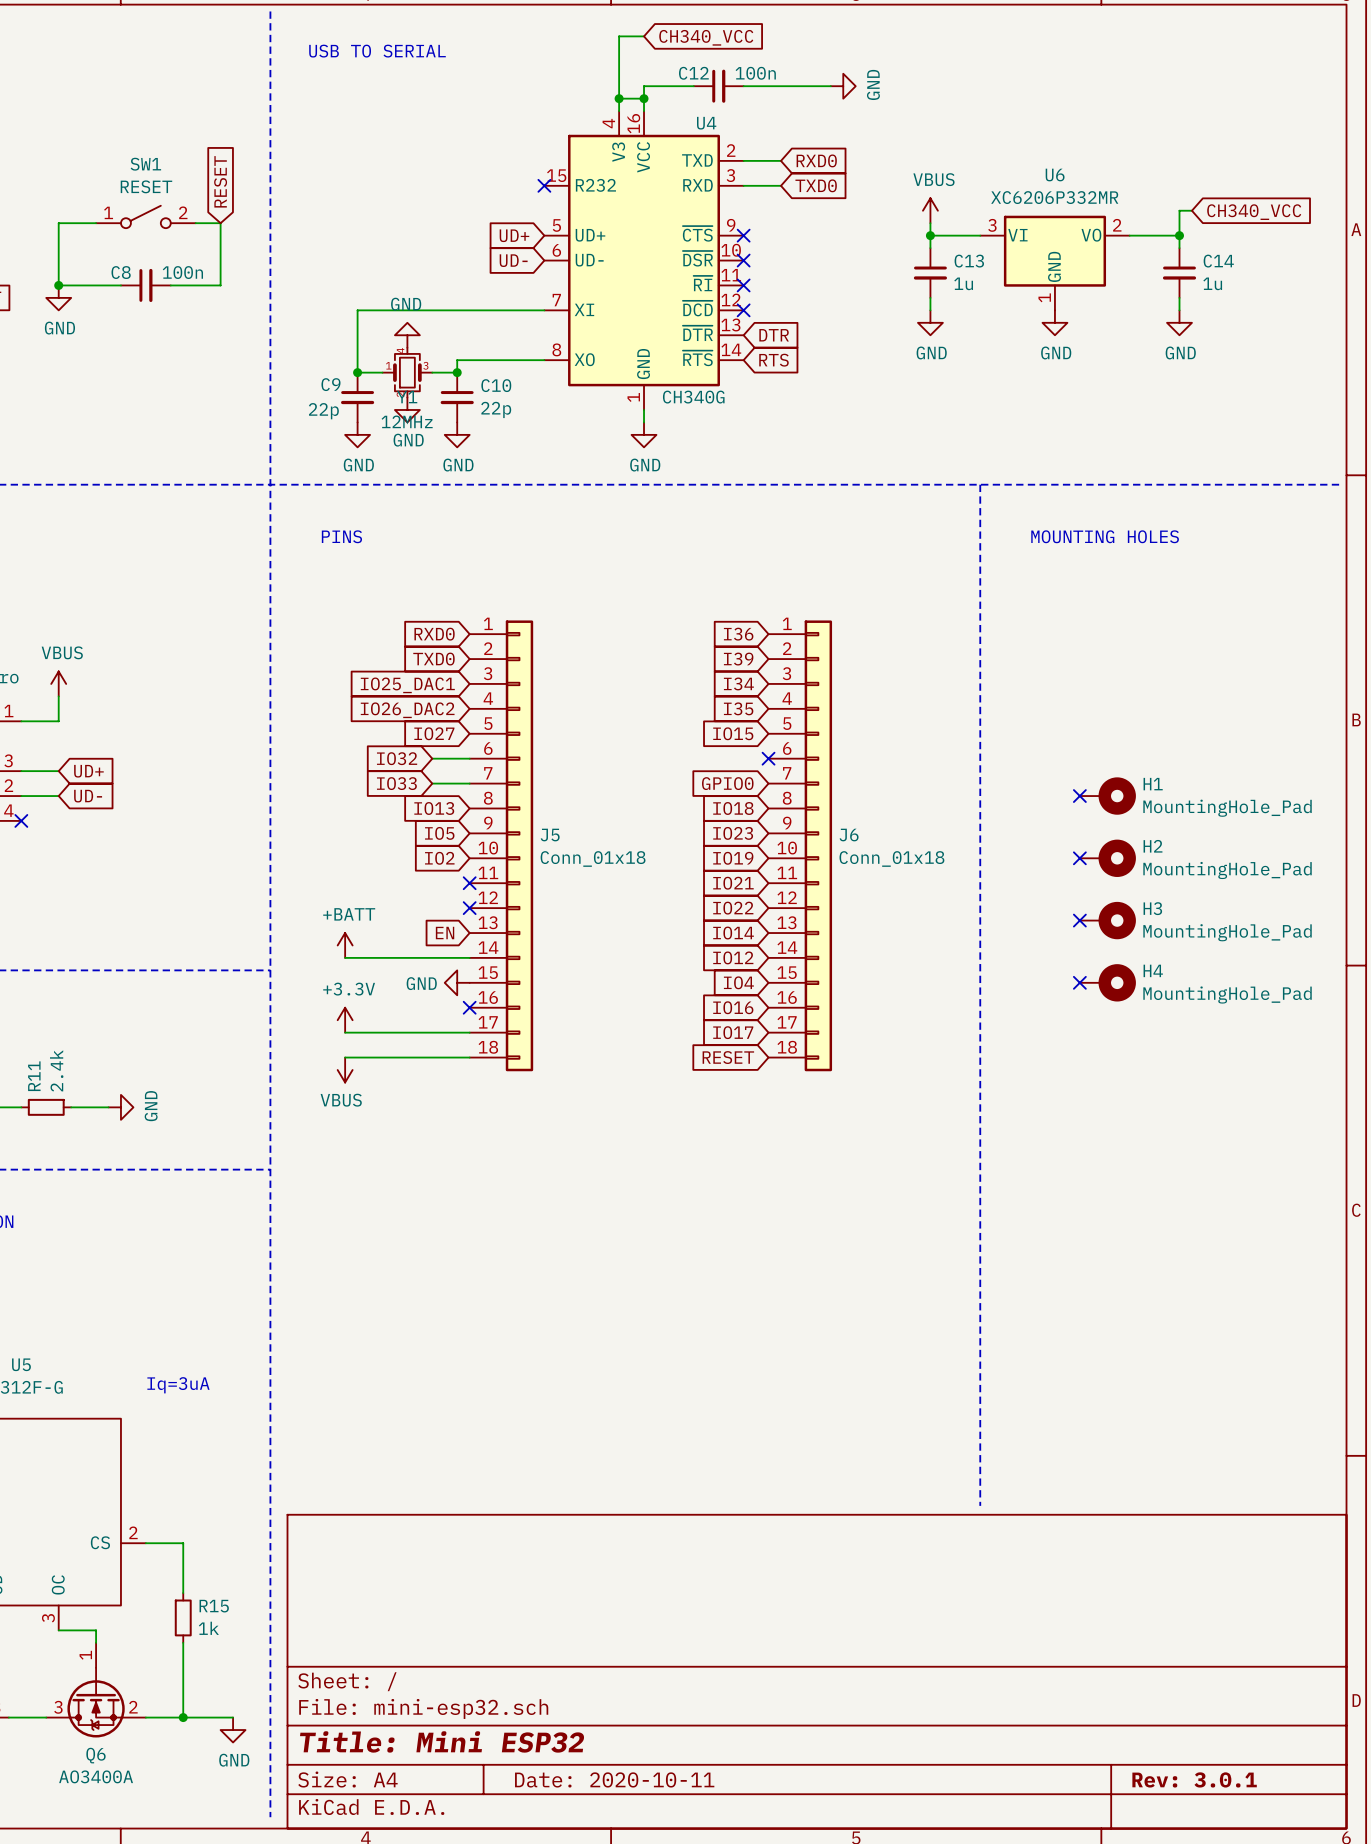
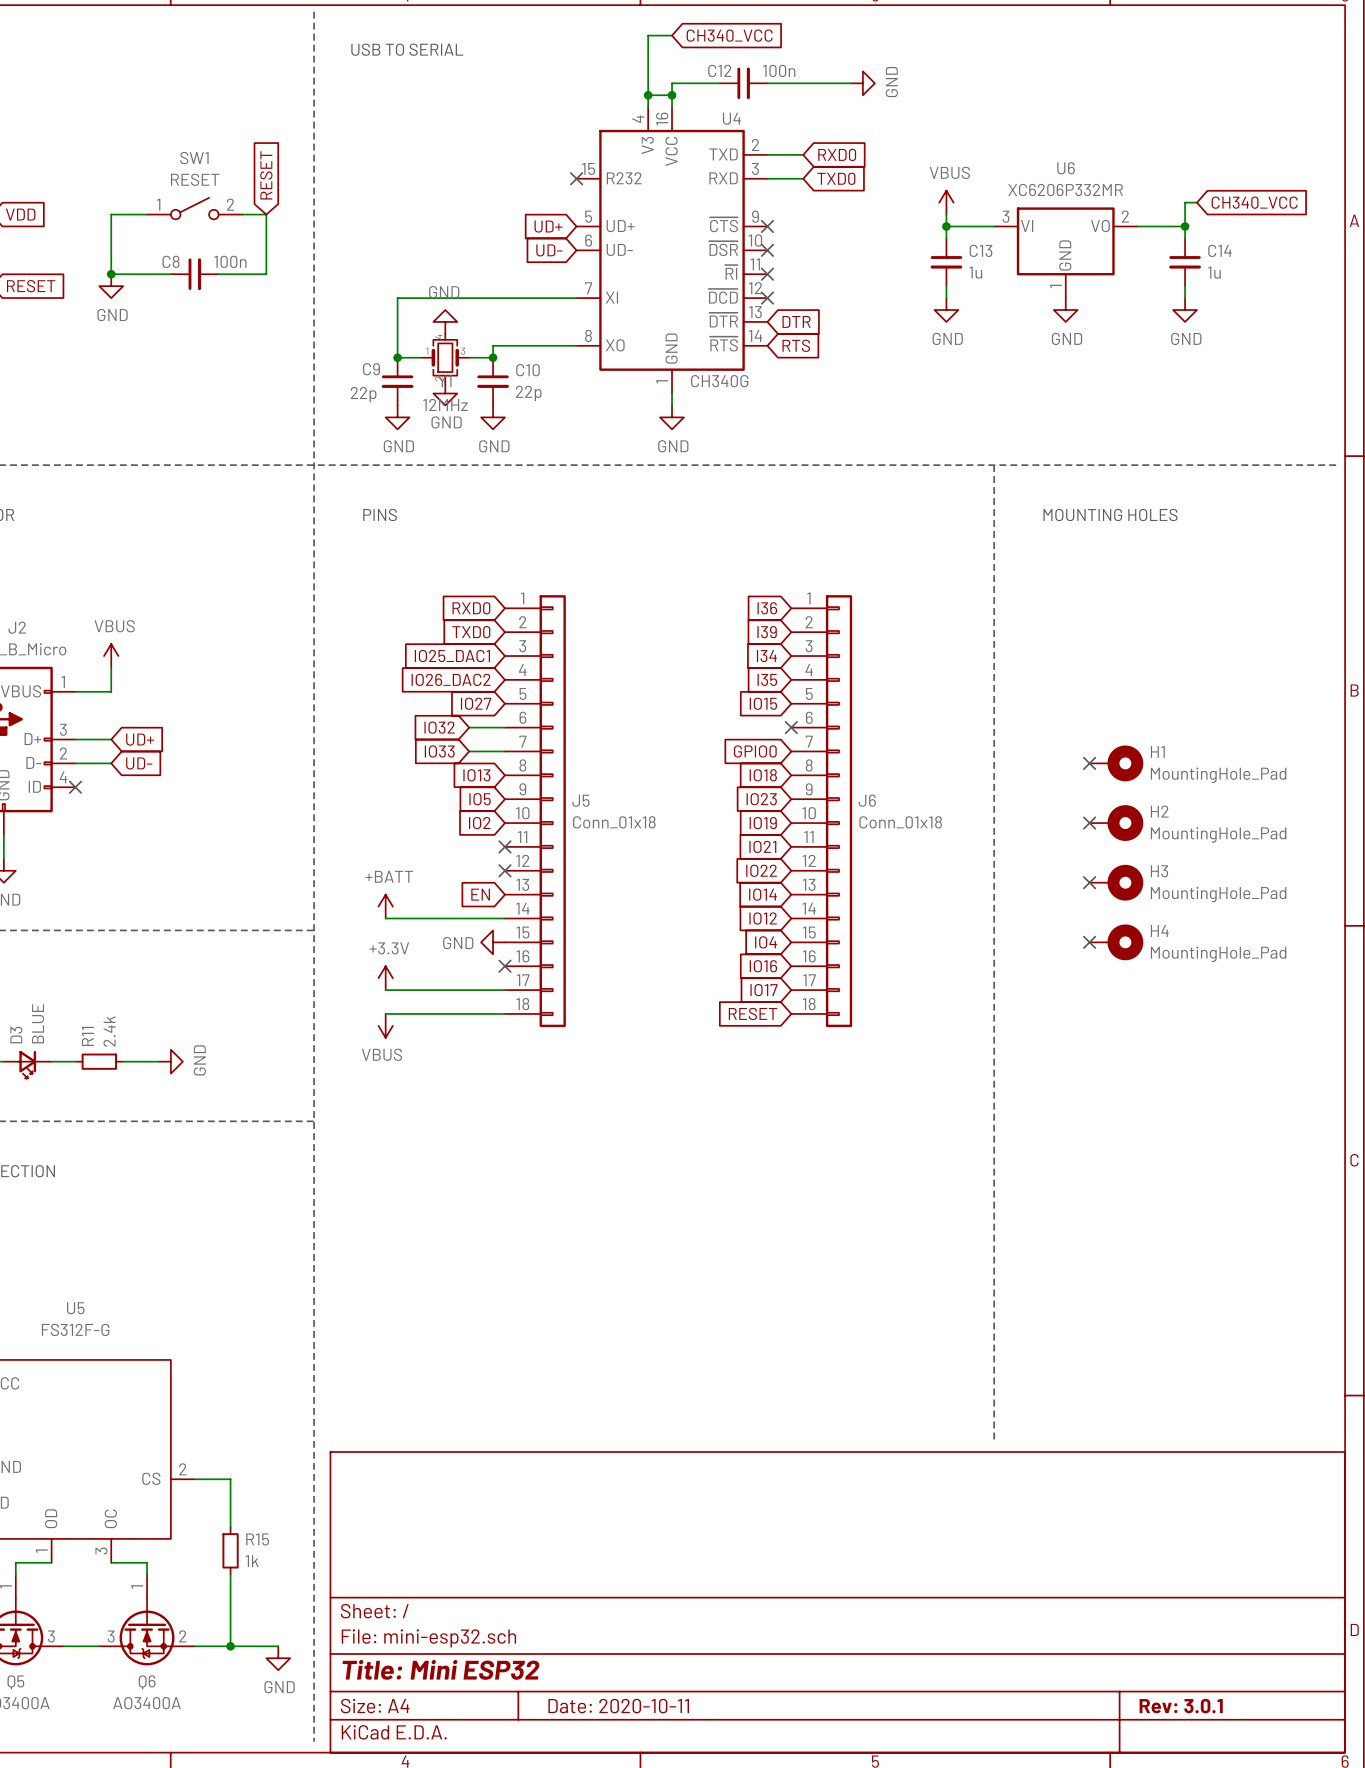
text: Iq=3uA (178, 1385) -> none

